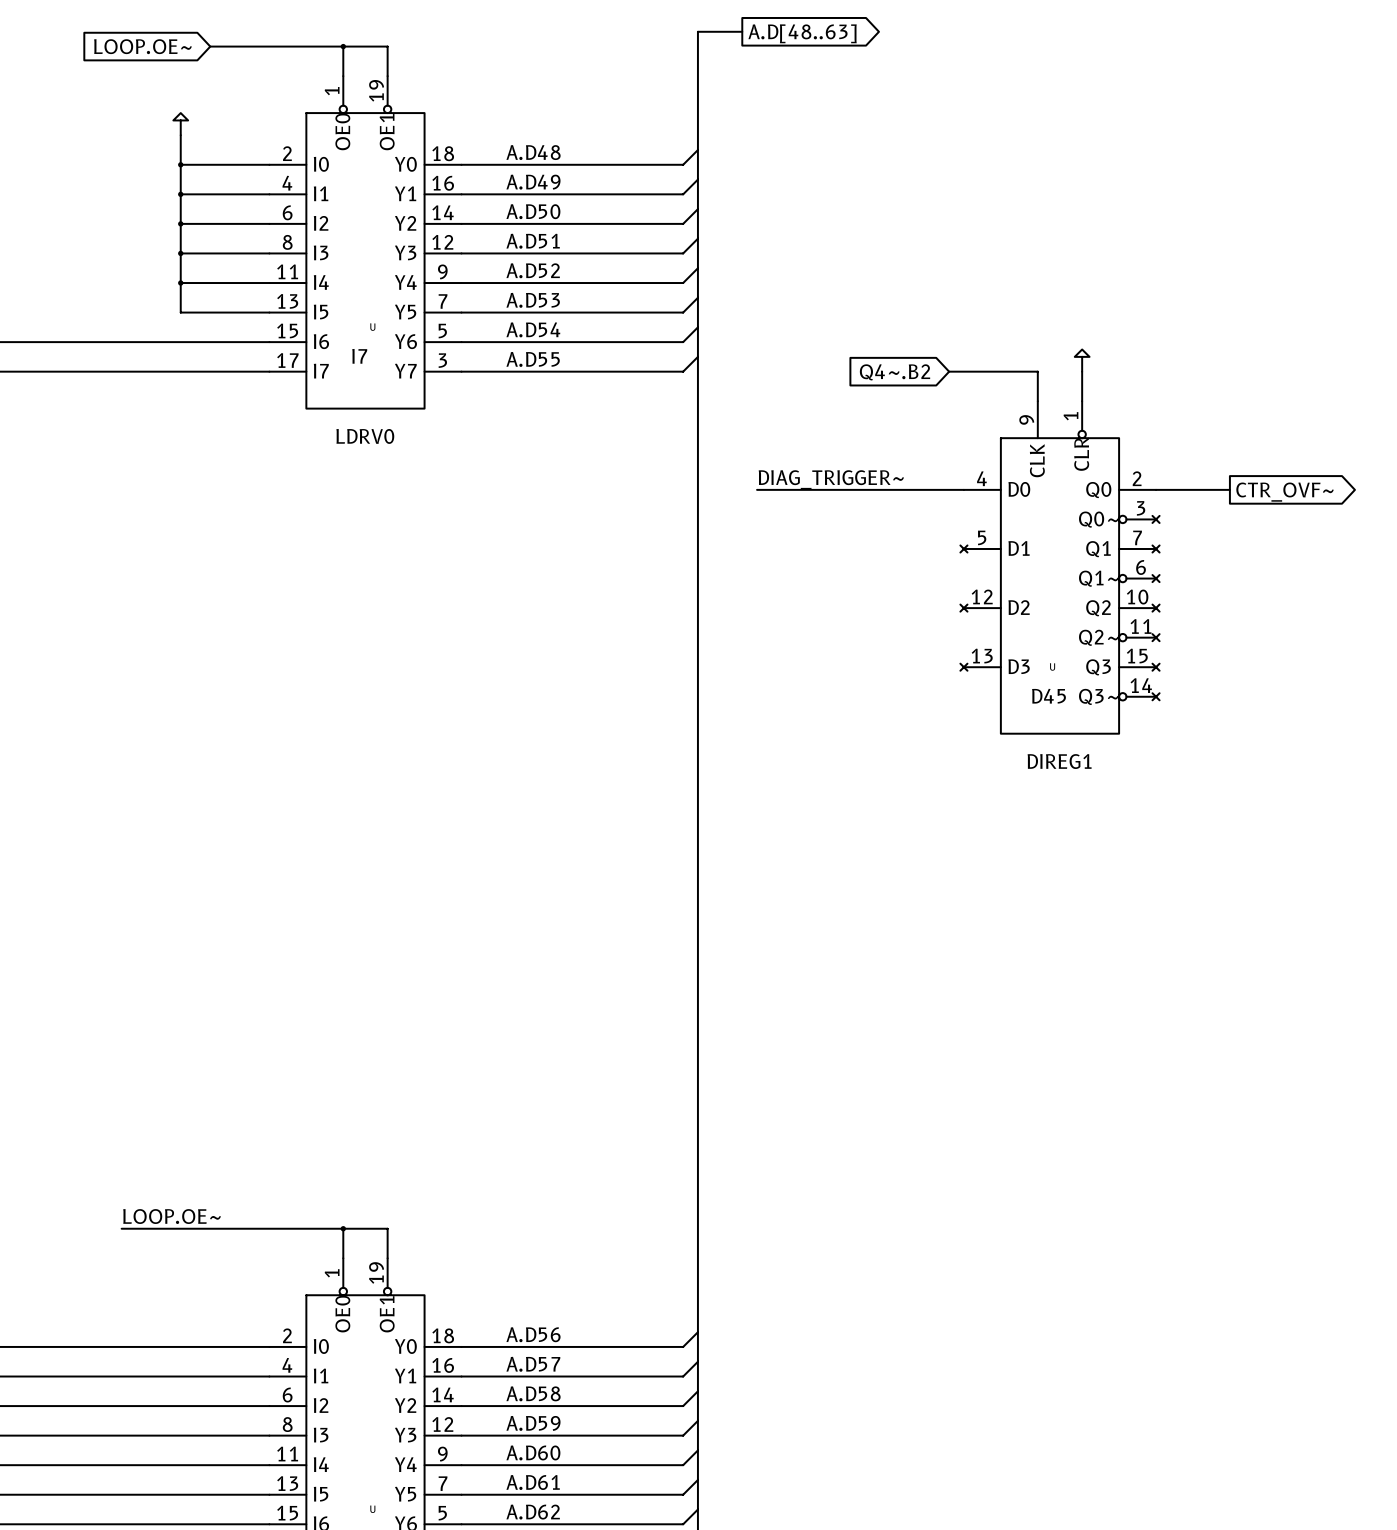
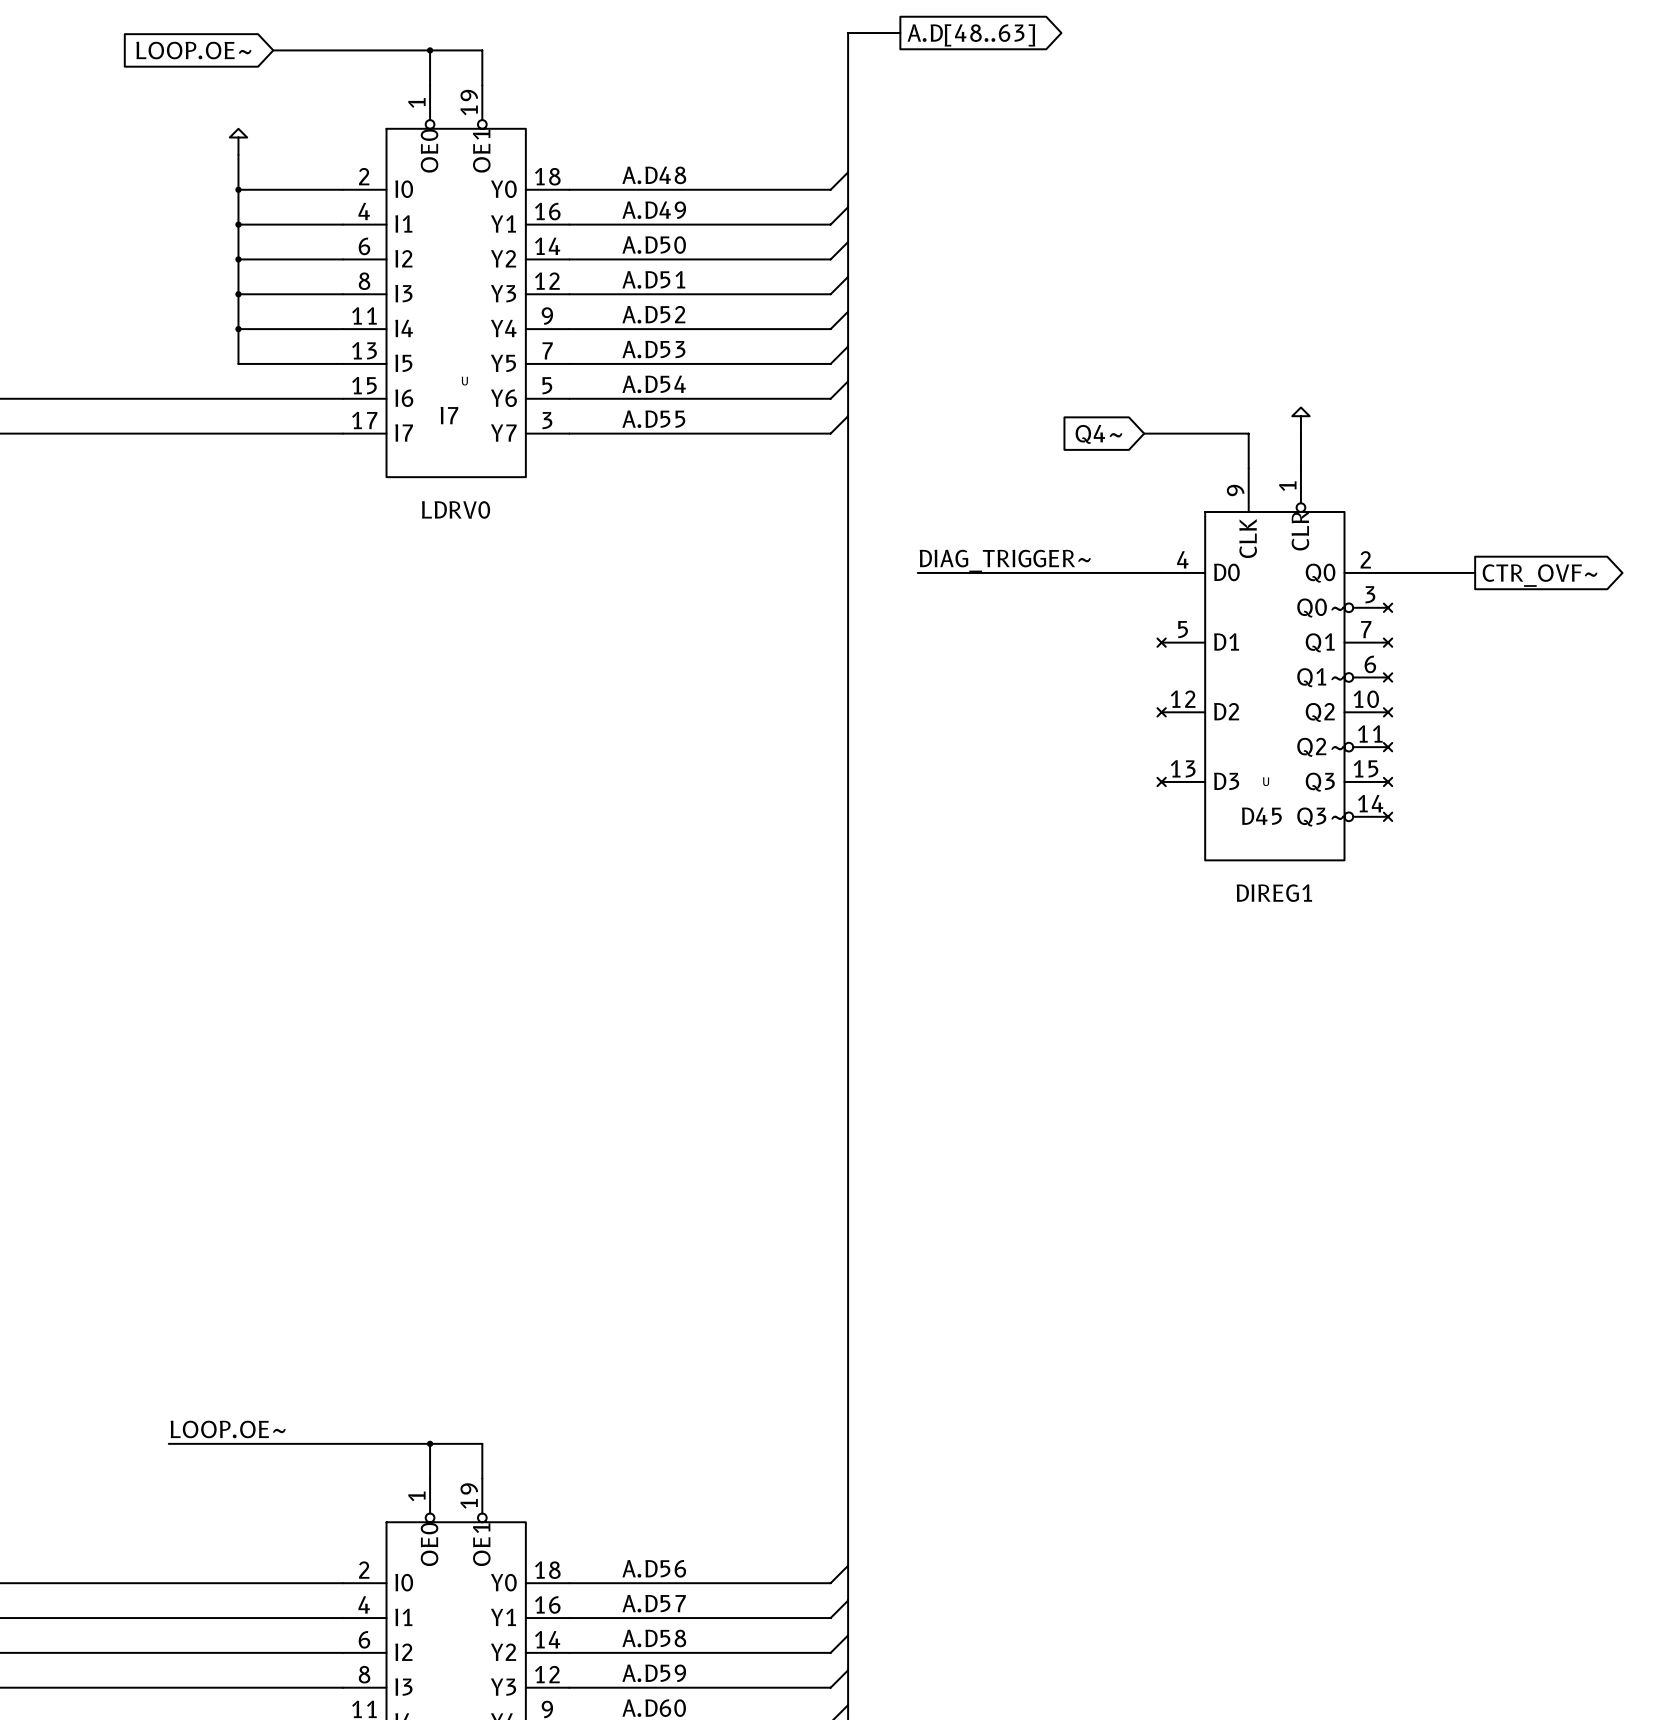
global label: Q4~.B2 (895, 372) -> Q4~ (1099, 434)

